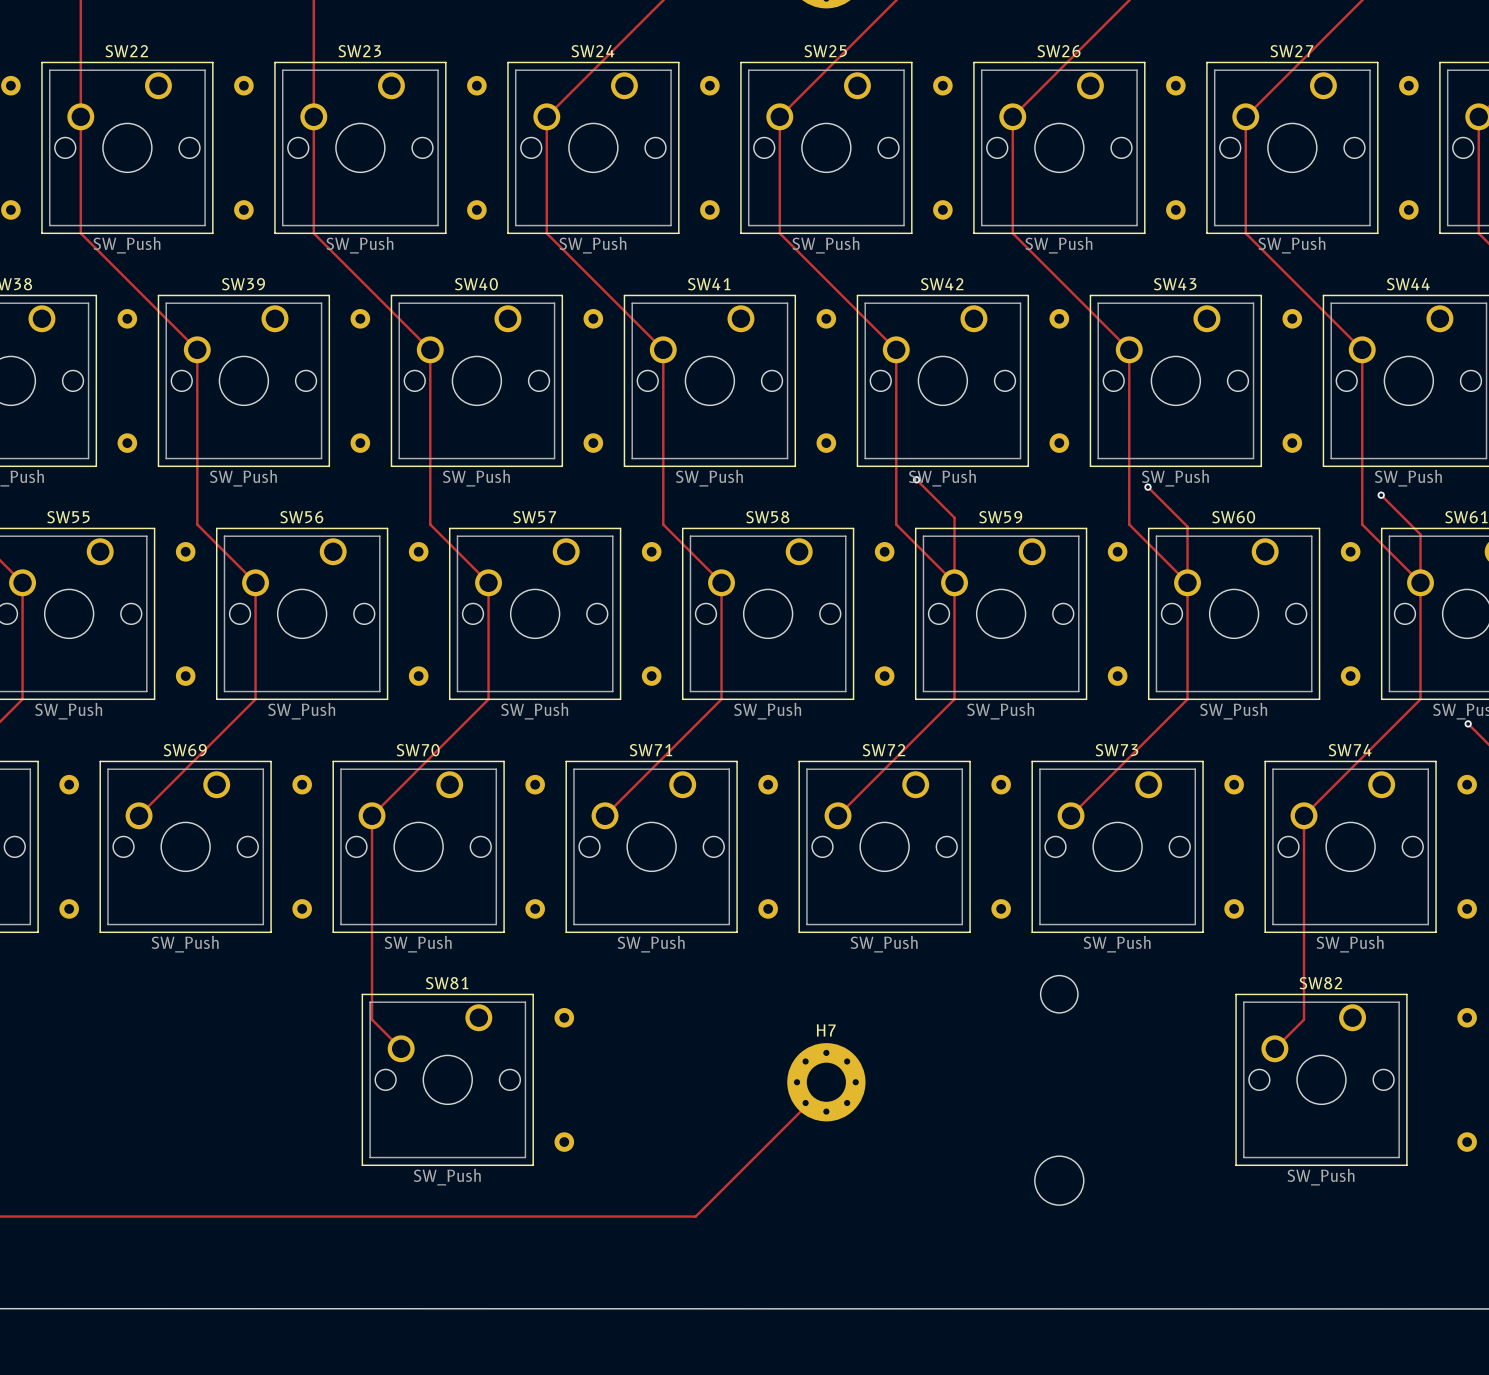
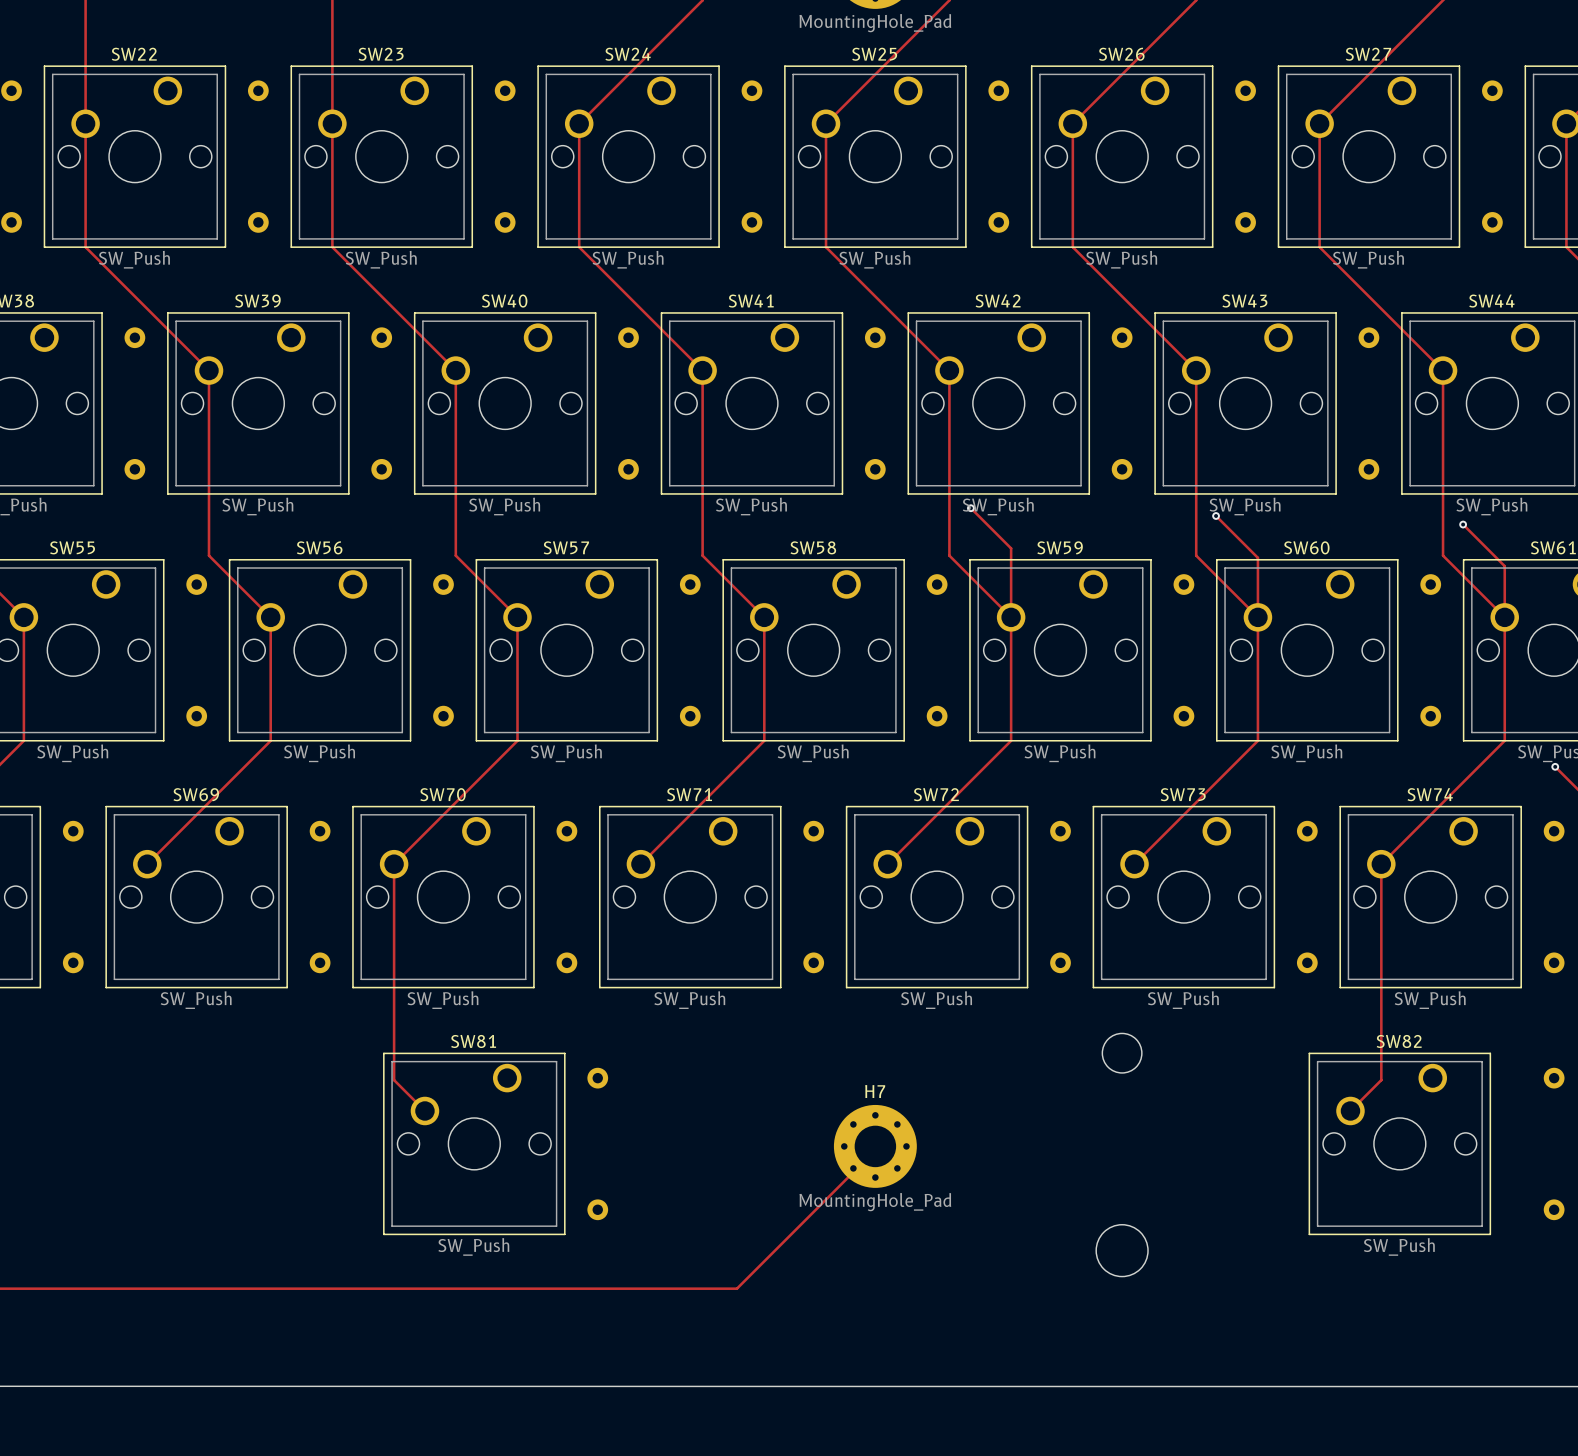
part value: none -> MountingHole_Pad (875, 23)
H7 value: none -> MountingHole_Pad (875, 1202)

